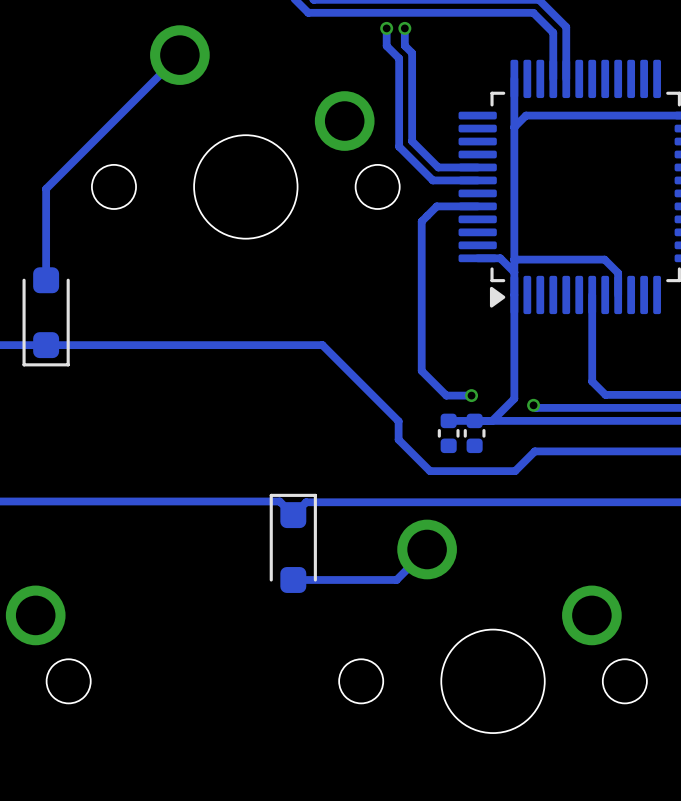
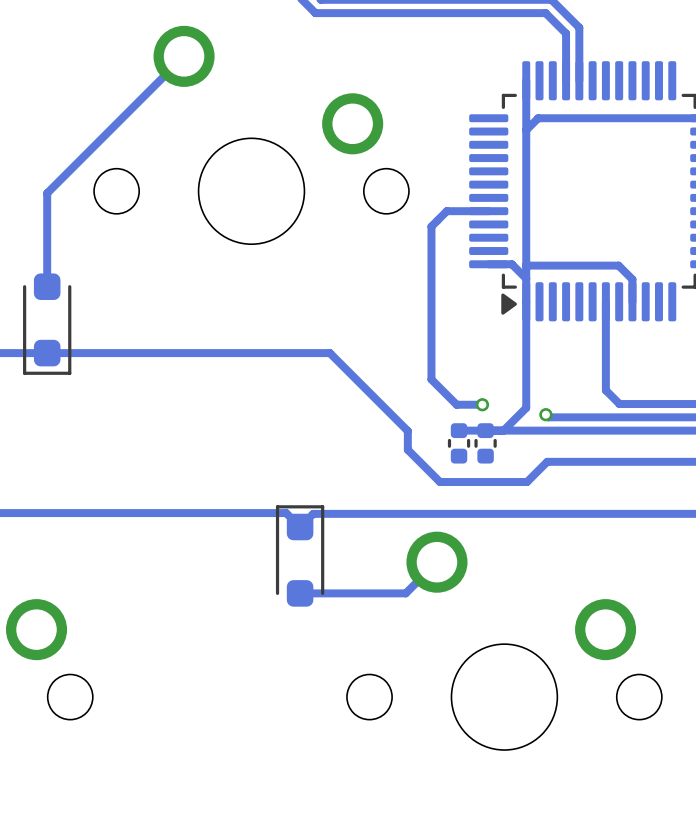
track: (386, 28) (386, 46) (399, 58) (399, 146) (432, 180) (477, 180) -> none
via: (386, 28) -> none
track: (404, 28) (404, 45) (412, 53) (412, 141) (438, 167) (477, 167) -> none
via: (404, 28) -> none

